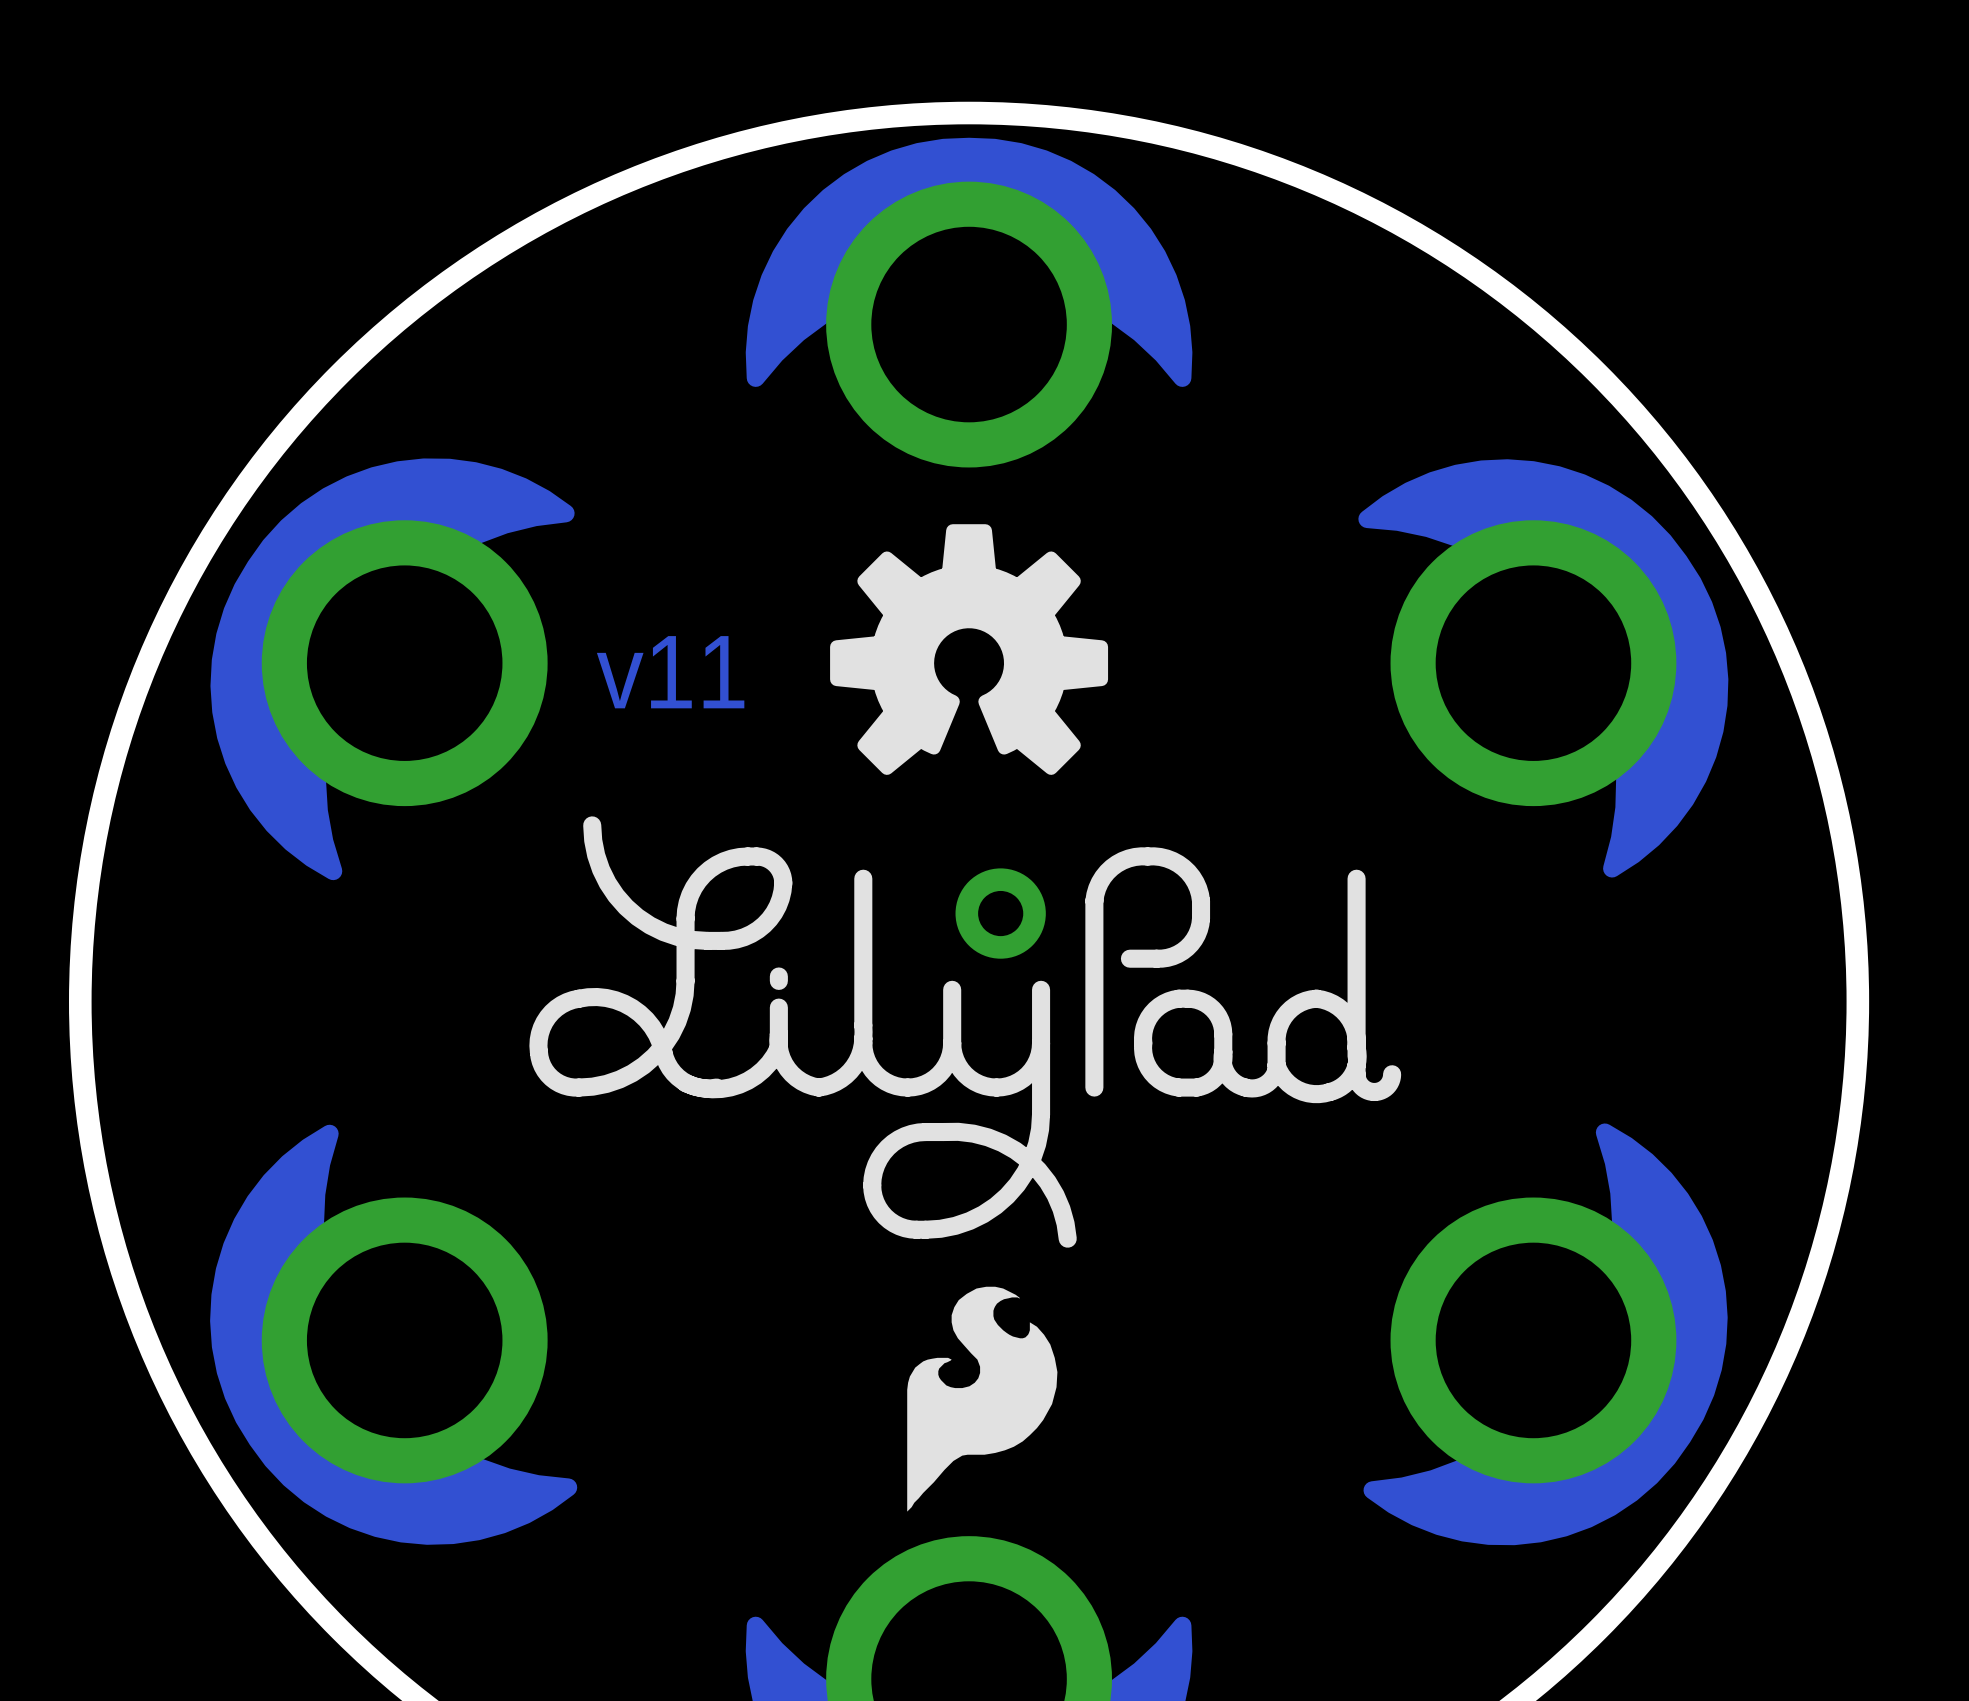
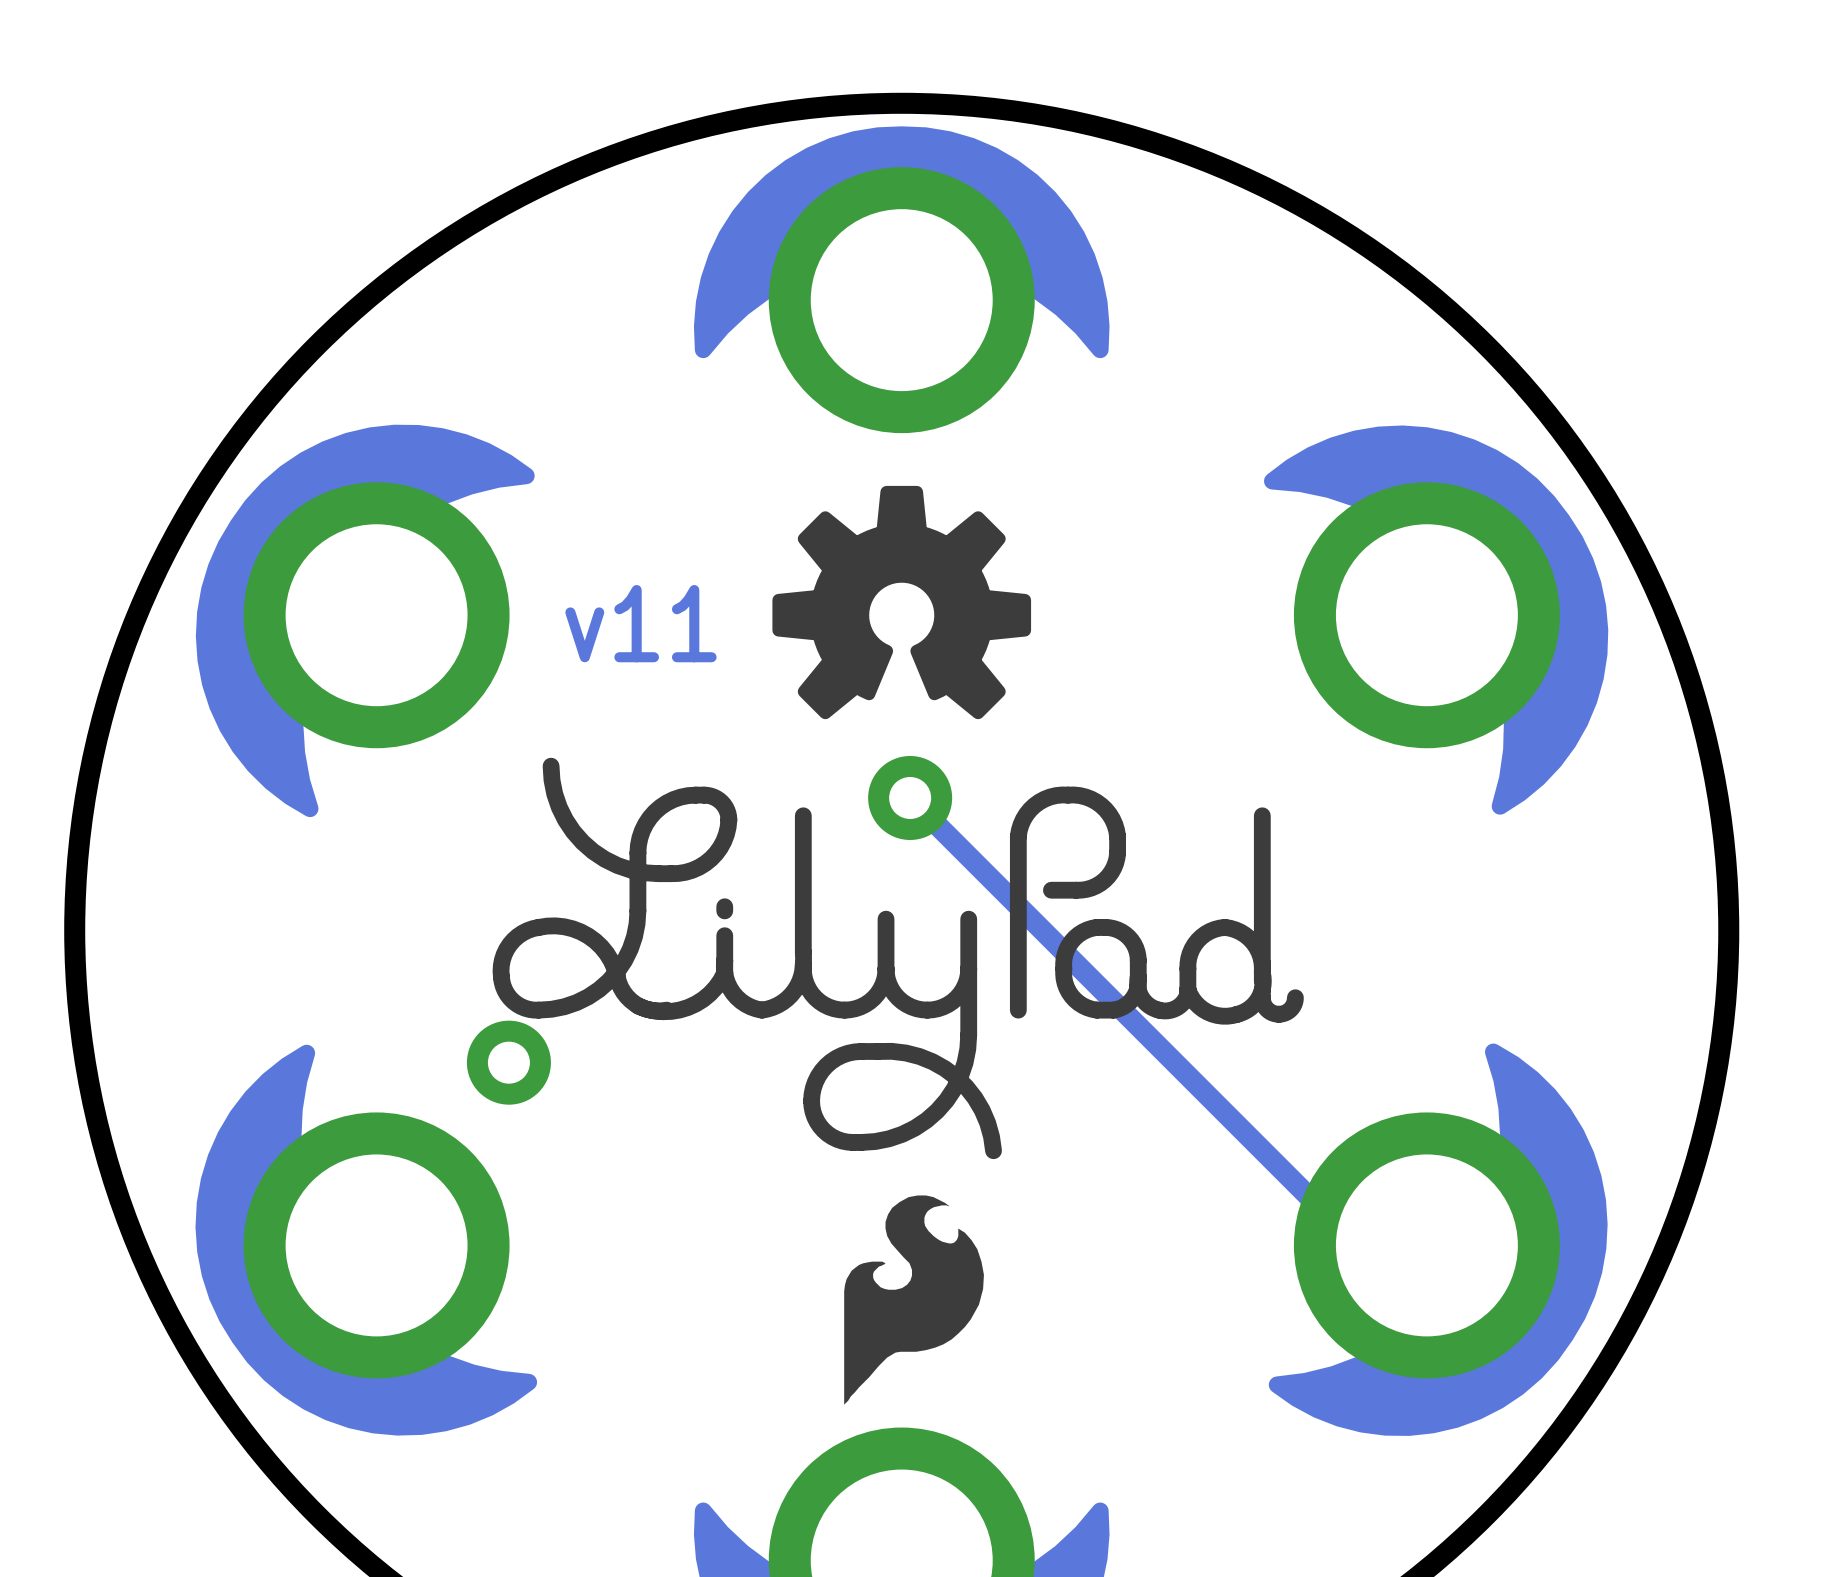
track: none -> (910, 797) (1357, 1245) (1426, 1245)
via position: (1000, 913) -> (910, 797)
via: none -> (508, 1062)

